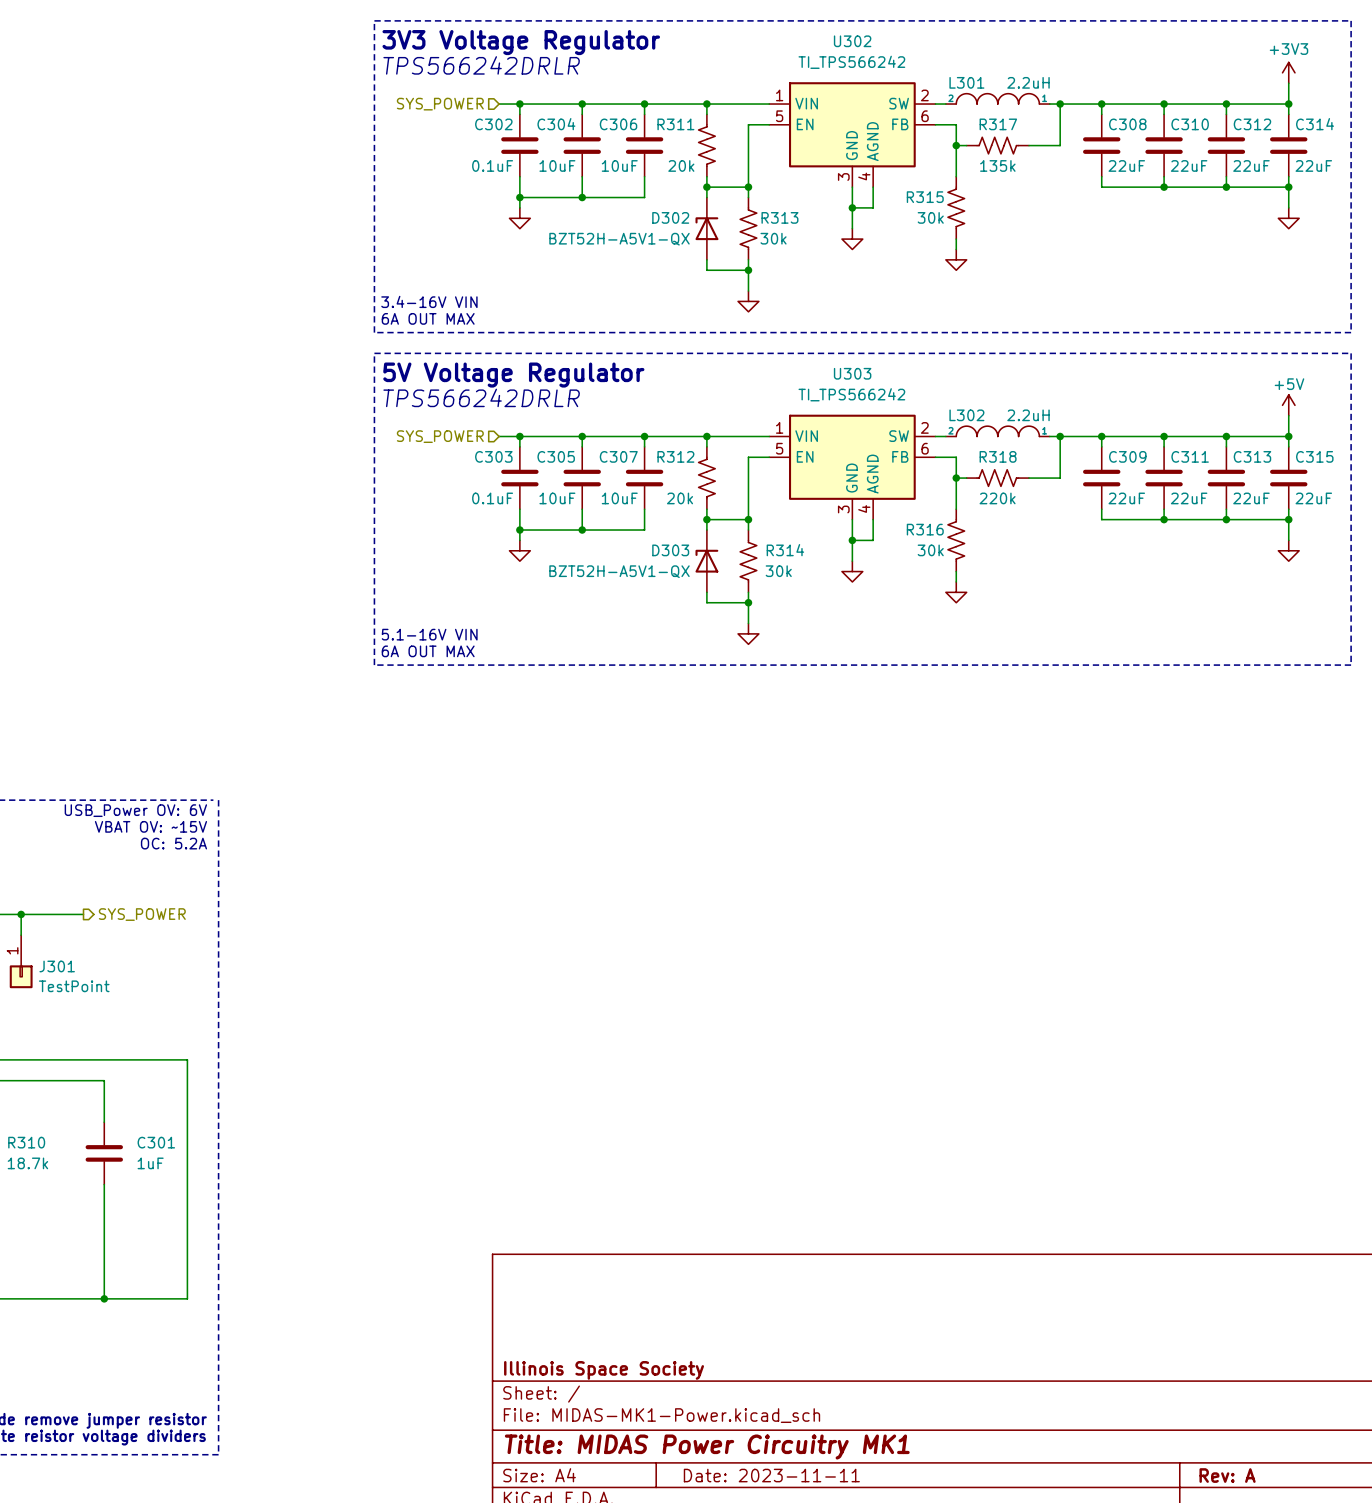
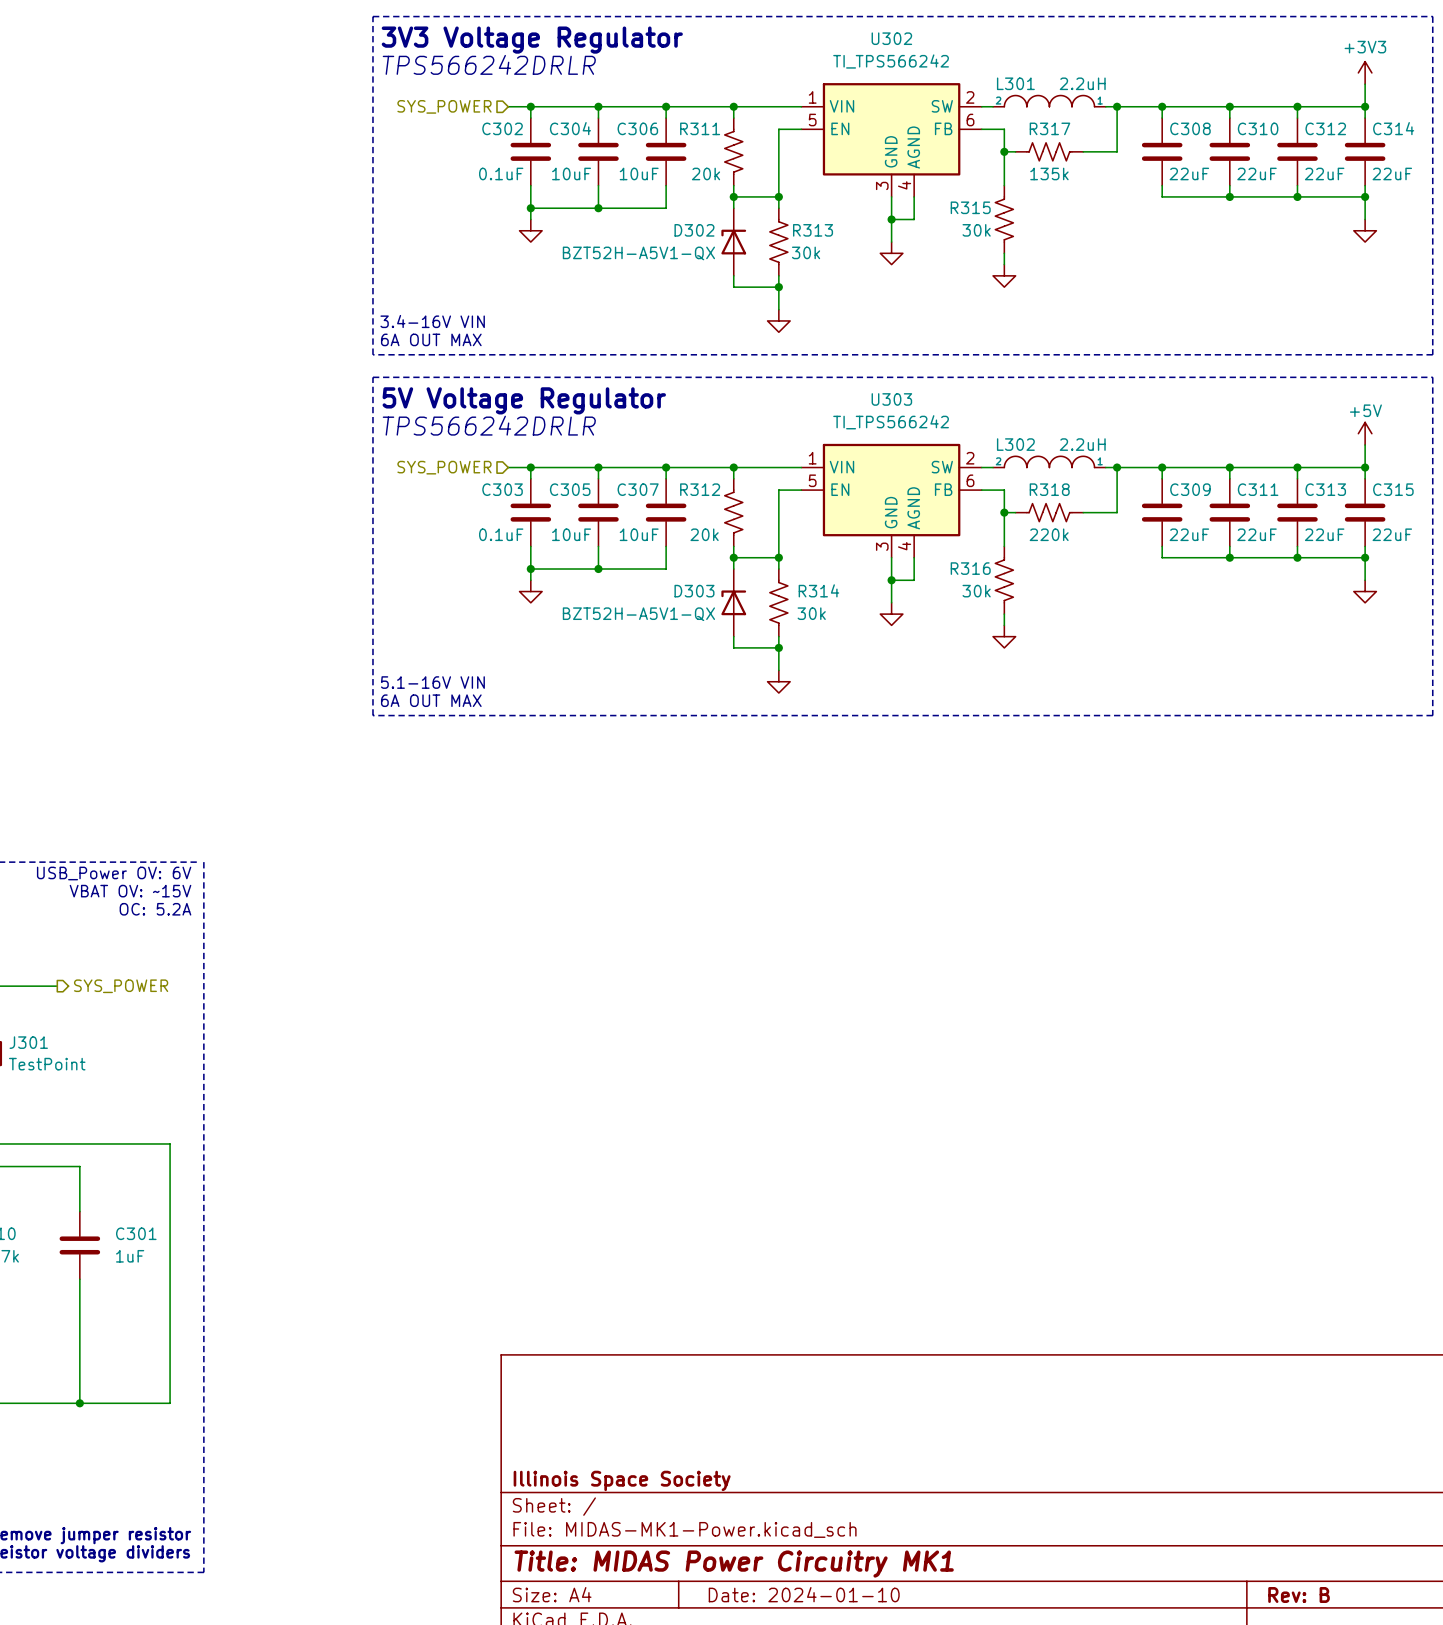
title block: Date: 2023-11-11 (771, 1475) -> Date: 2024-01-10 (804, 1594)
title block: Rev: A (1227, 1475) -> Rev: B (1299, 1594)

